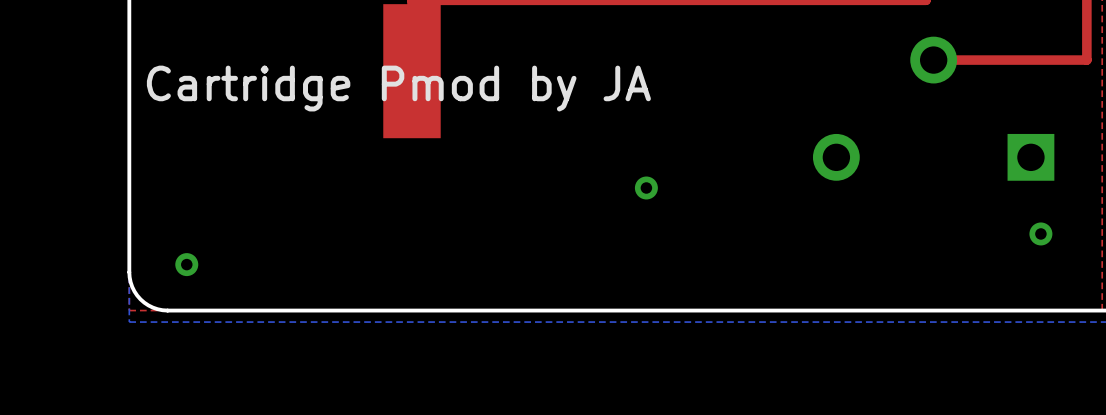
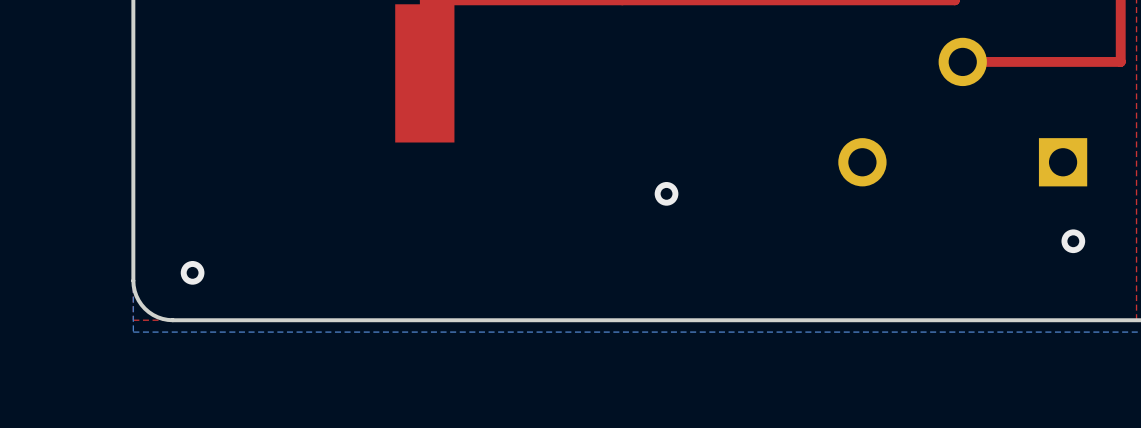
text: Cartridge Pmod by JA (398, 88) -> none

